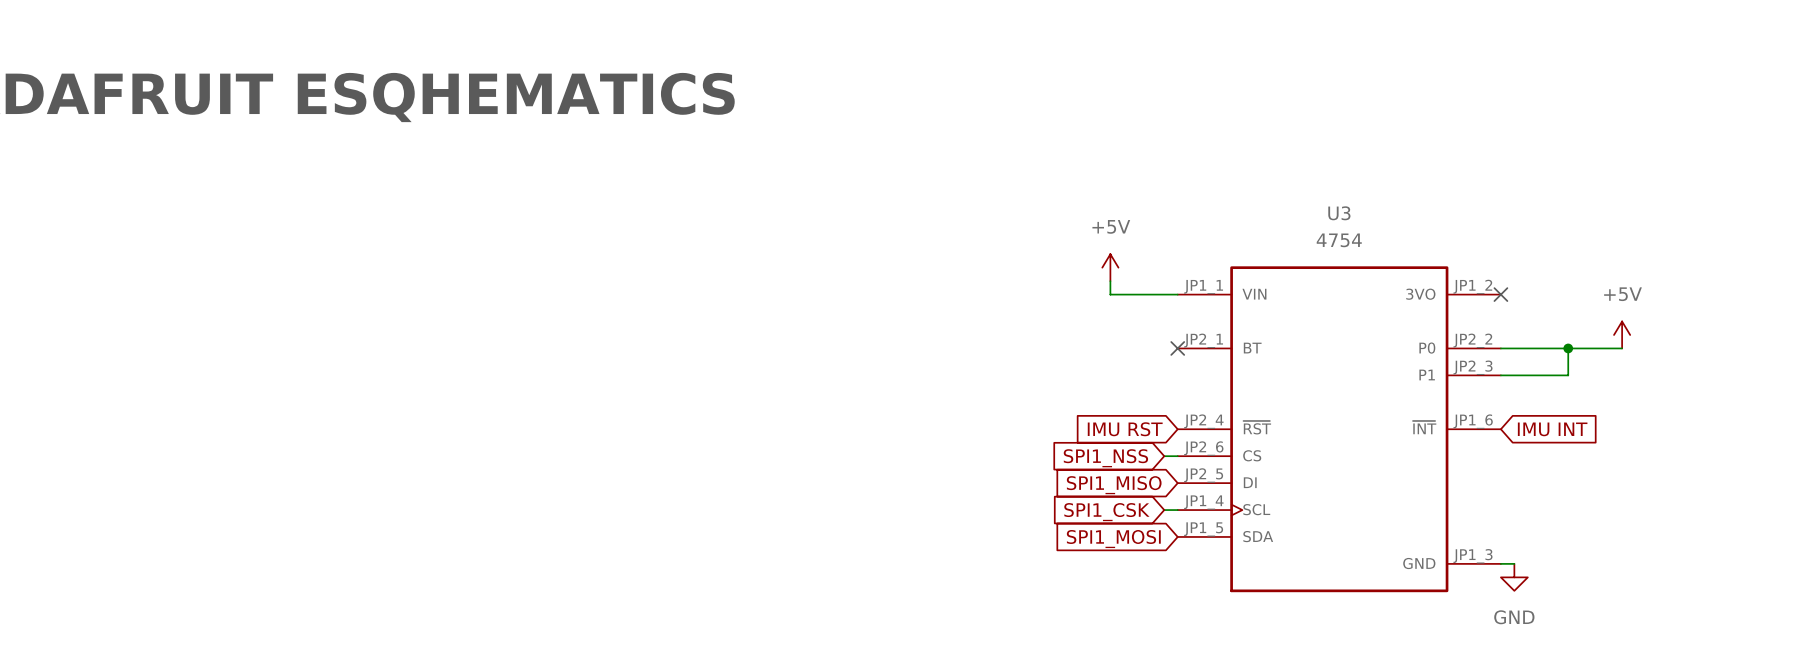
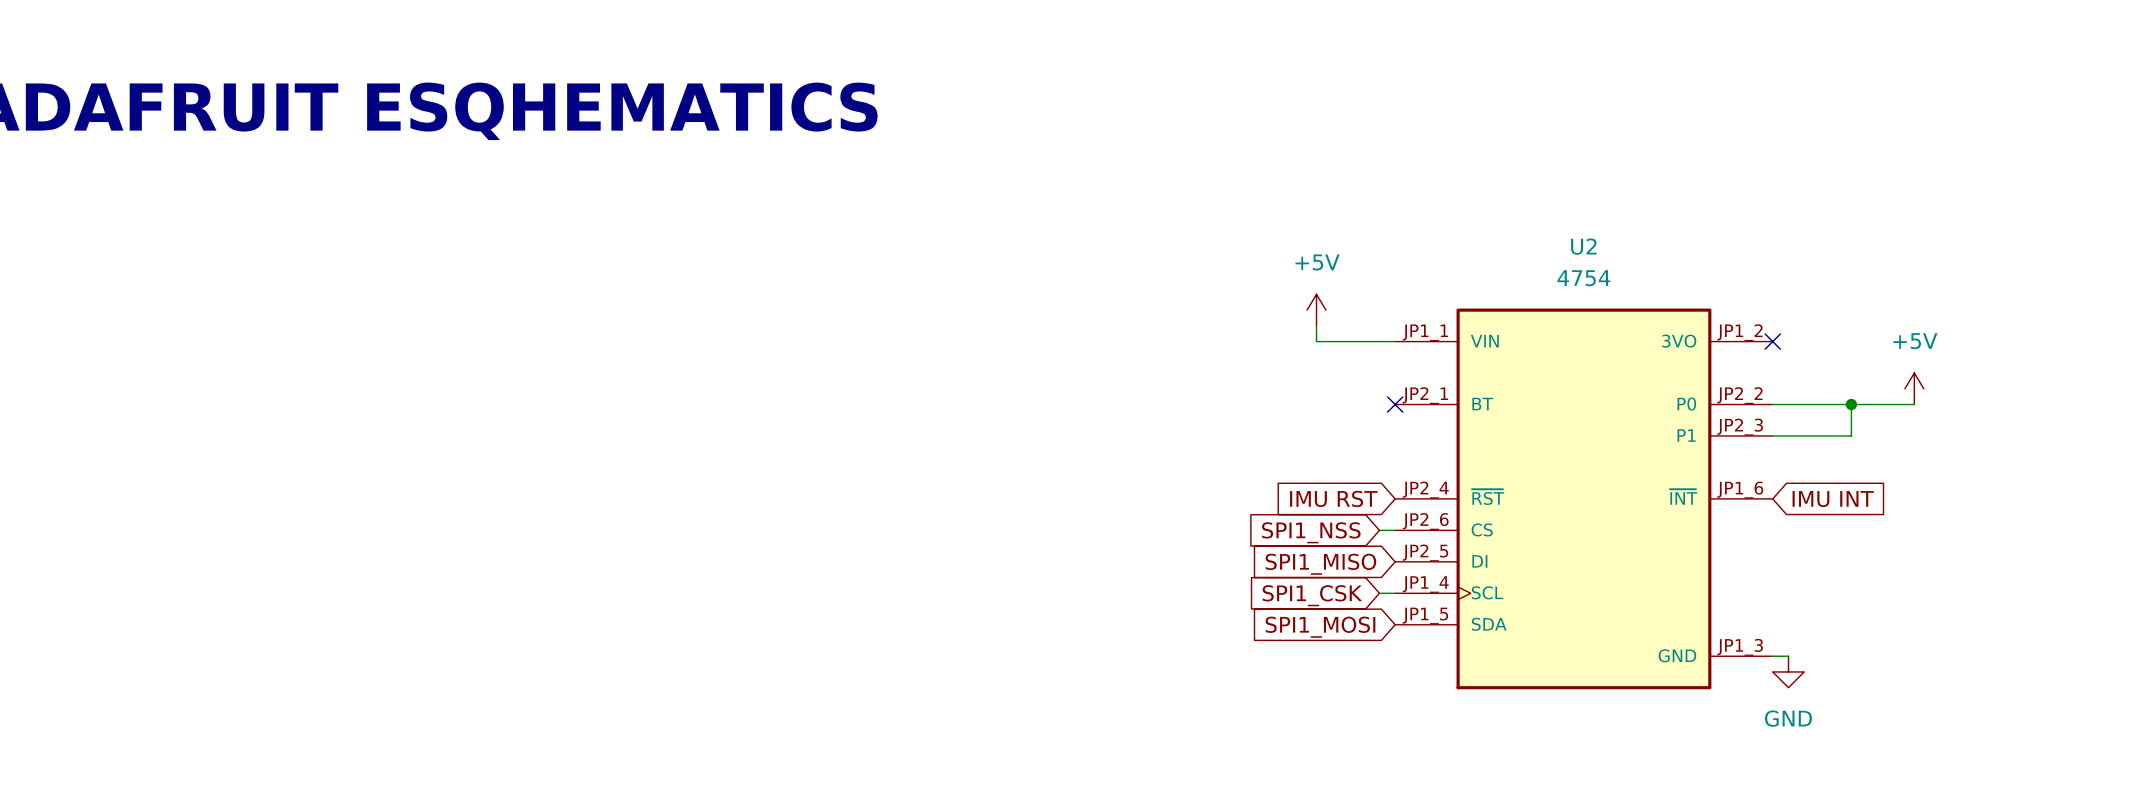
U3 name: U3 (1339, 213) -> U2 (1583, 246)

